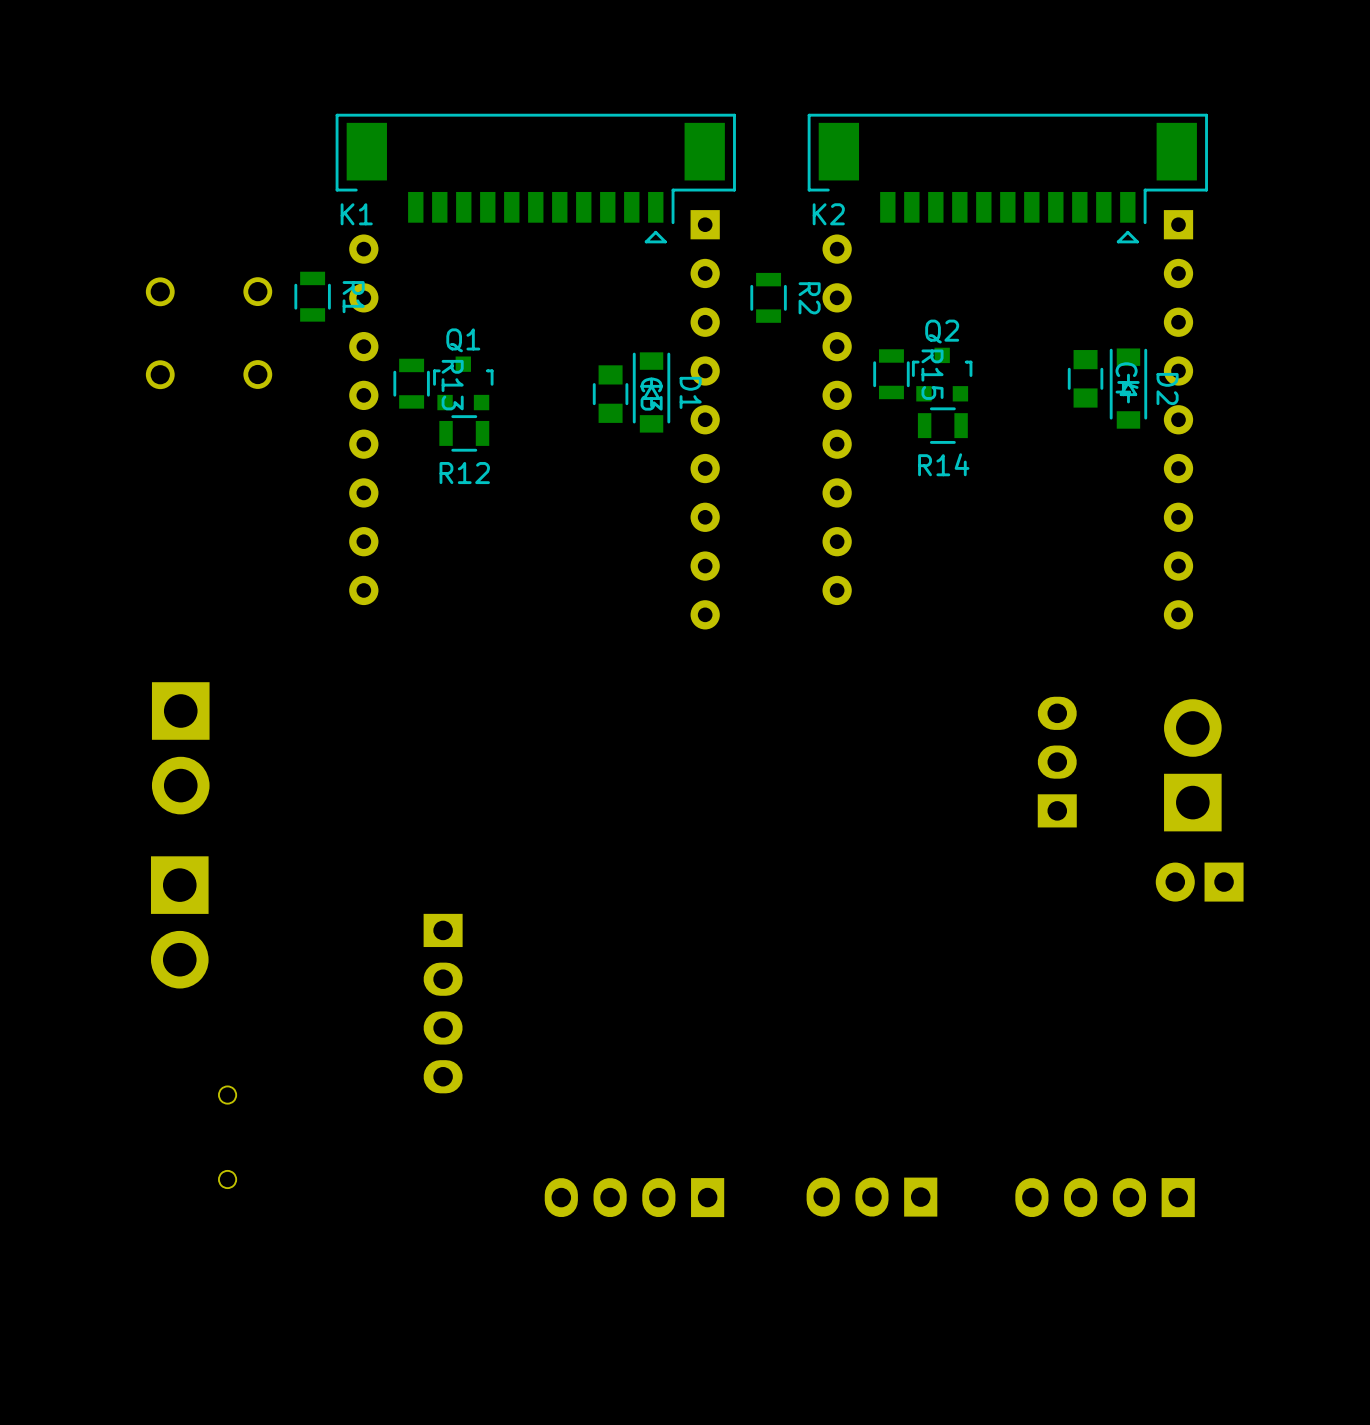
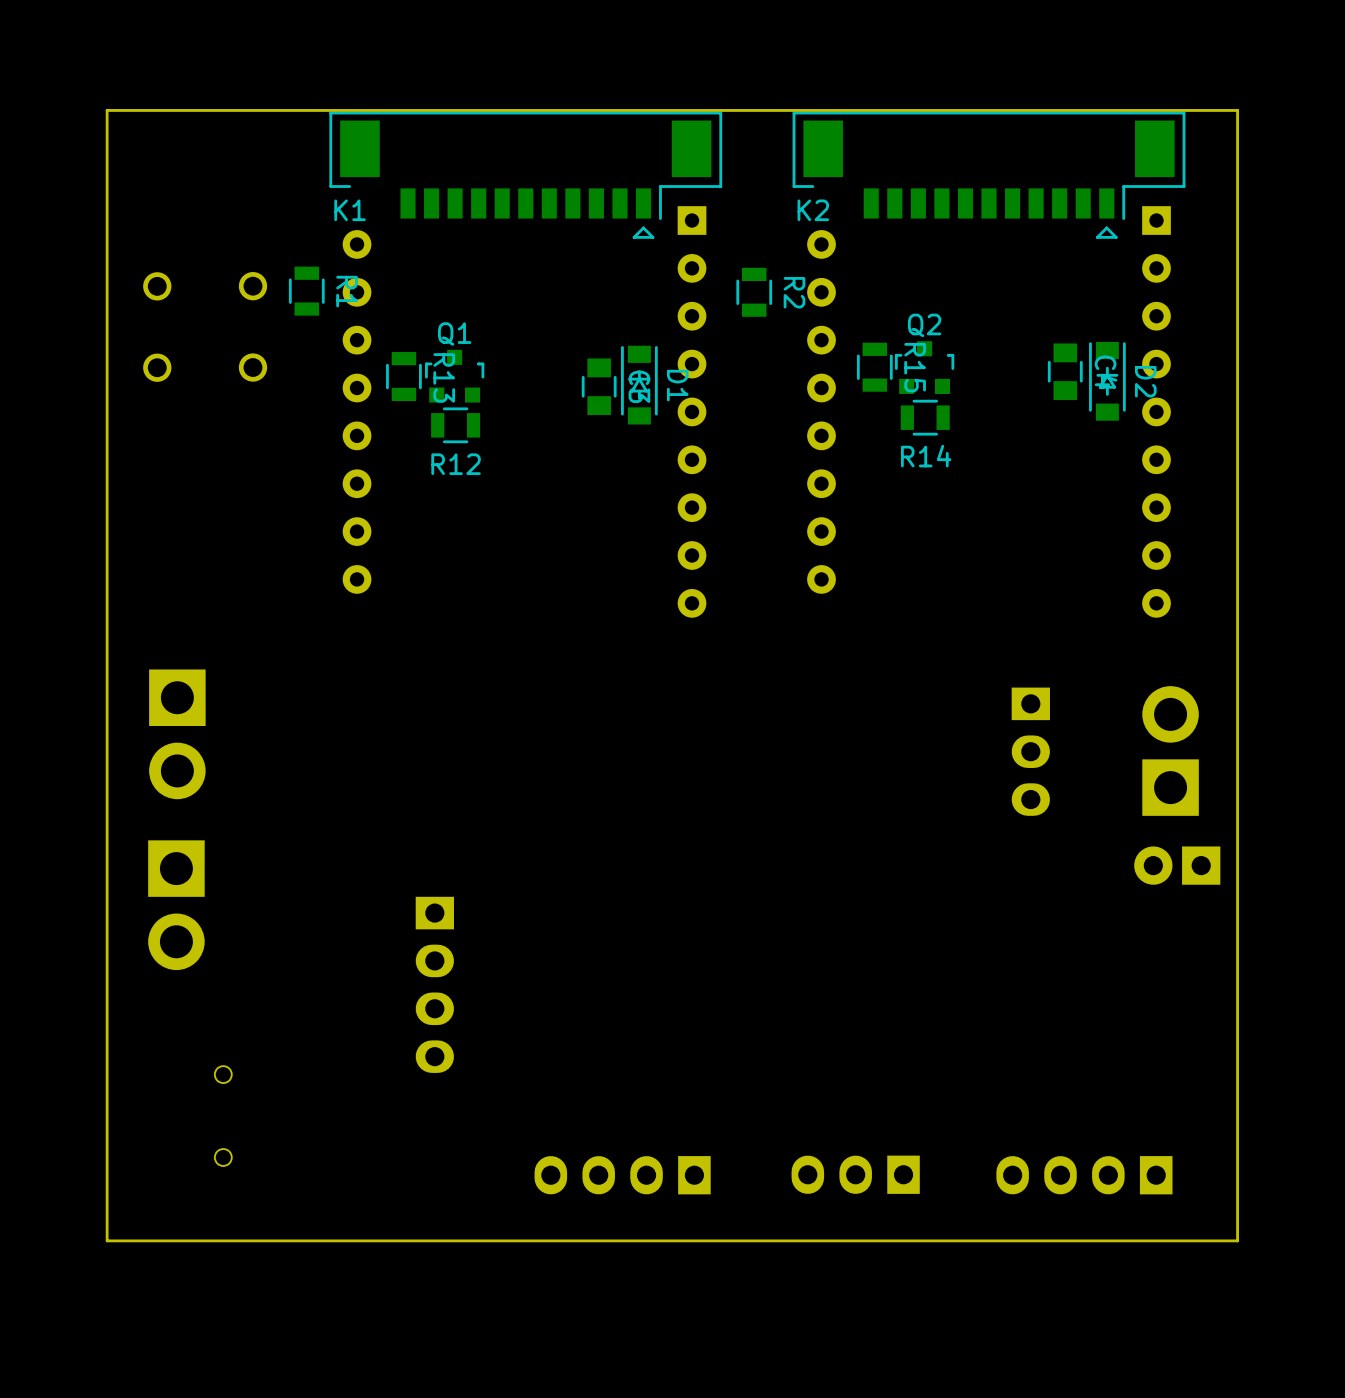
board edge: none -> (1237, 110) (1237, 1240) (107, 1240) (107, 110) (1237, 110)
part rotation: 0° (1057, 762) -> 180° (1030, 751)

